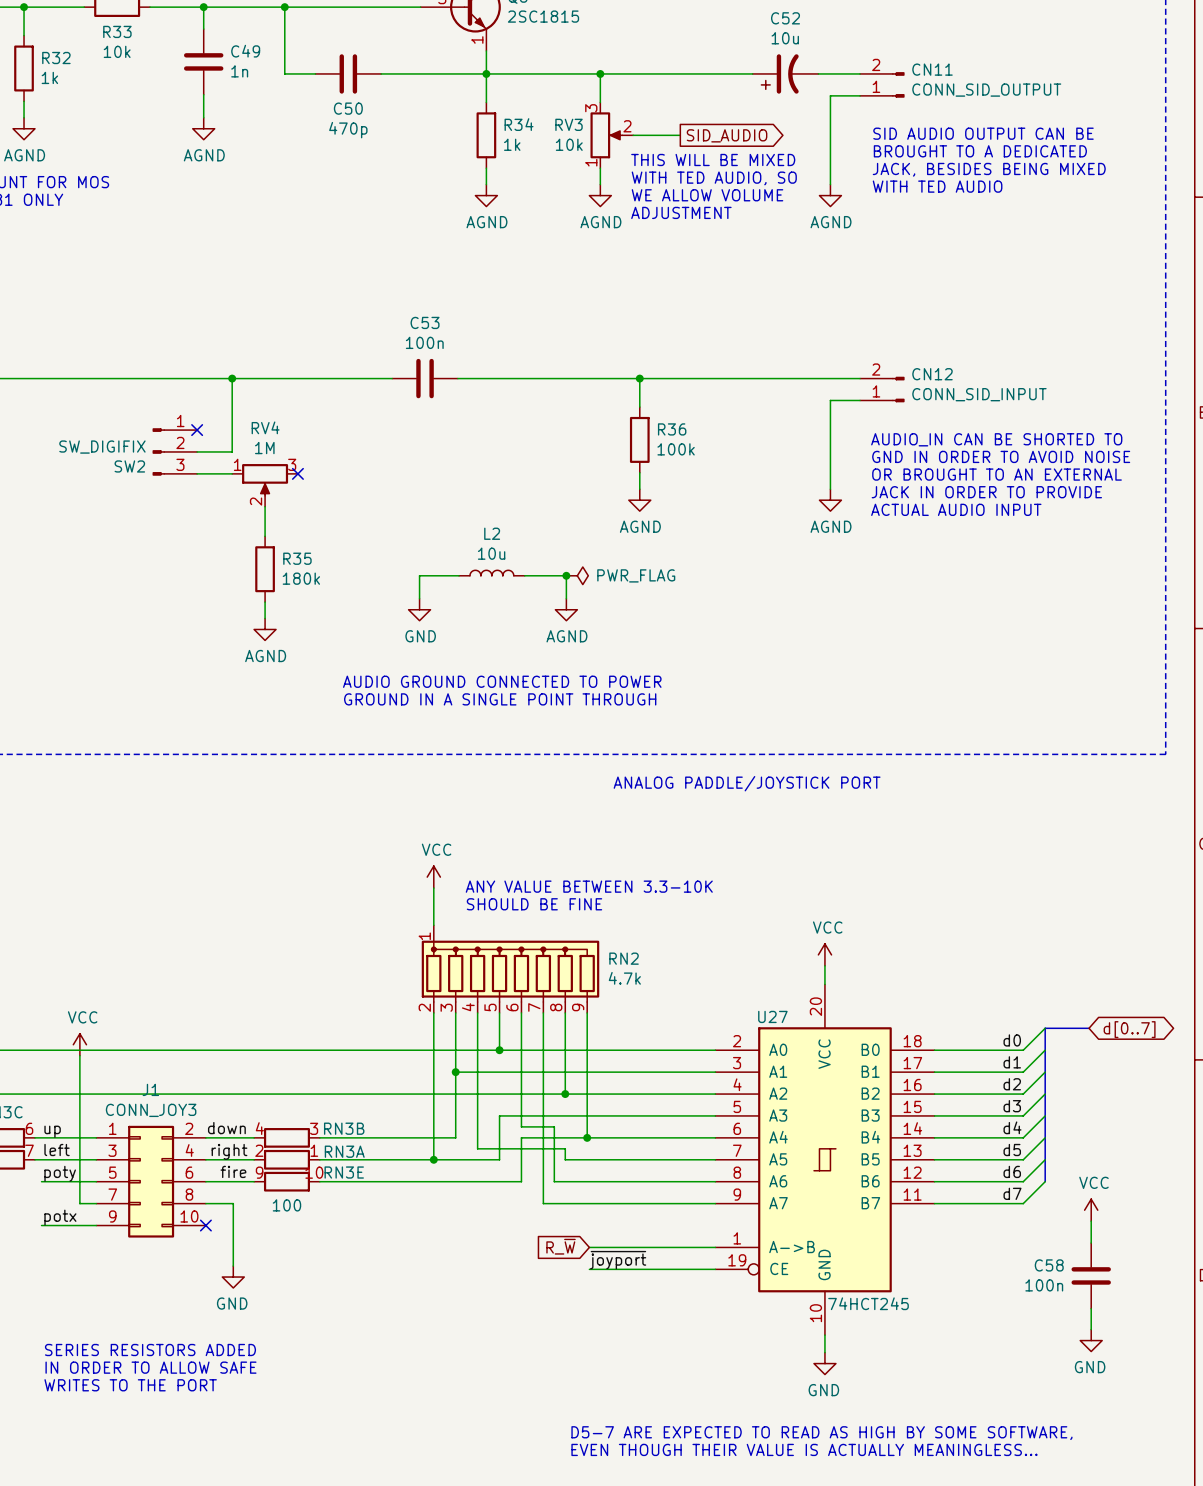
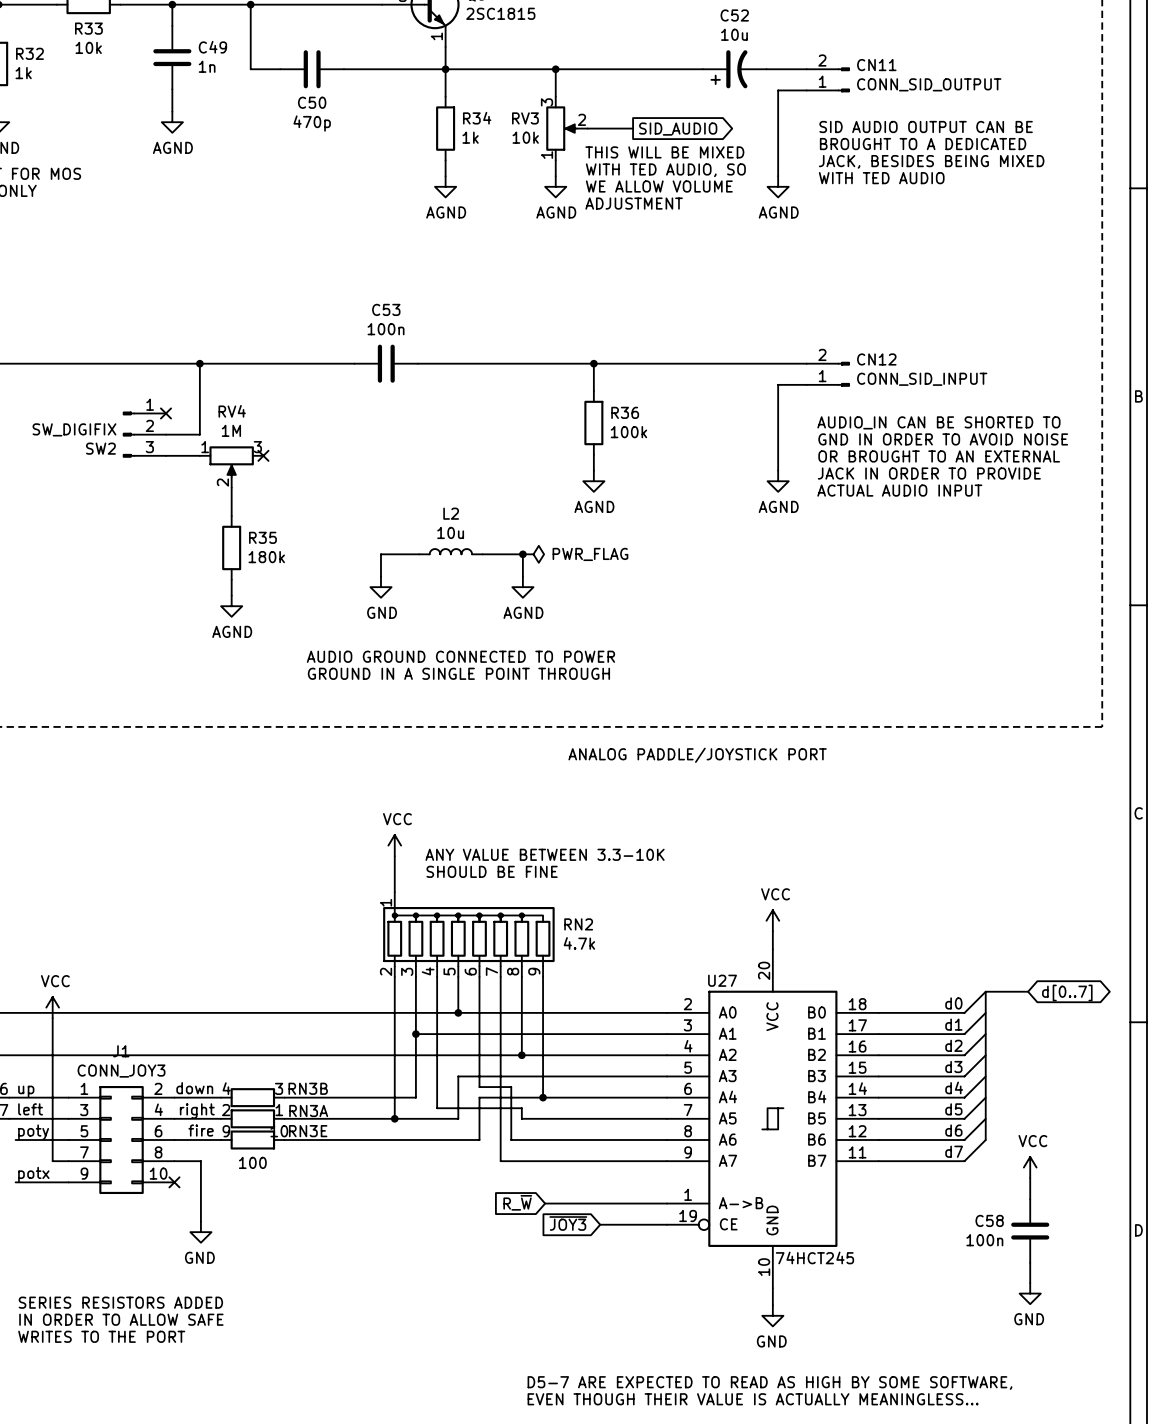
label: ~{joyport} (618, 1260) -> none
global label: none -> ~{JOY3} (568, 1223)
wire: (589, 1269) (646, 1269) -> none

